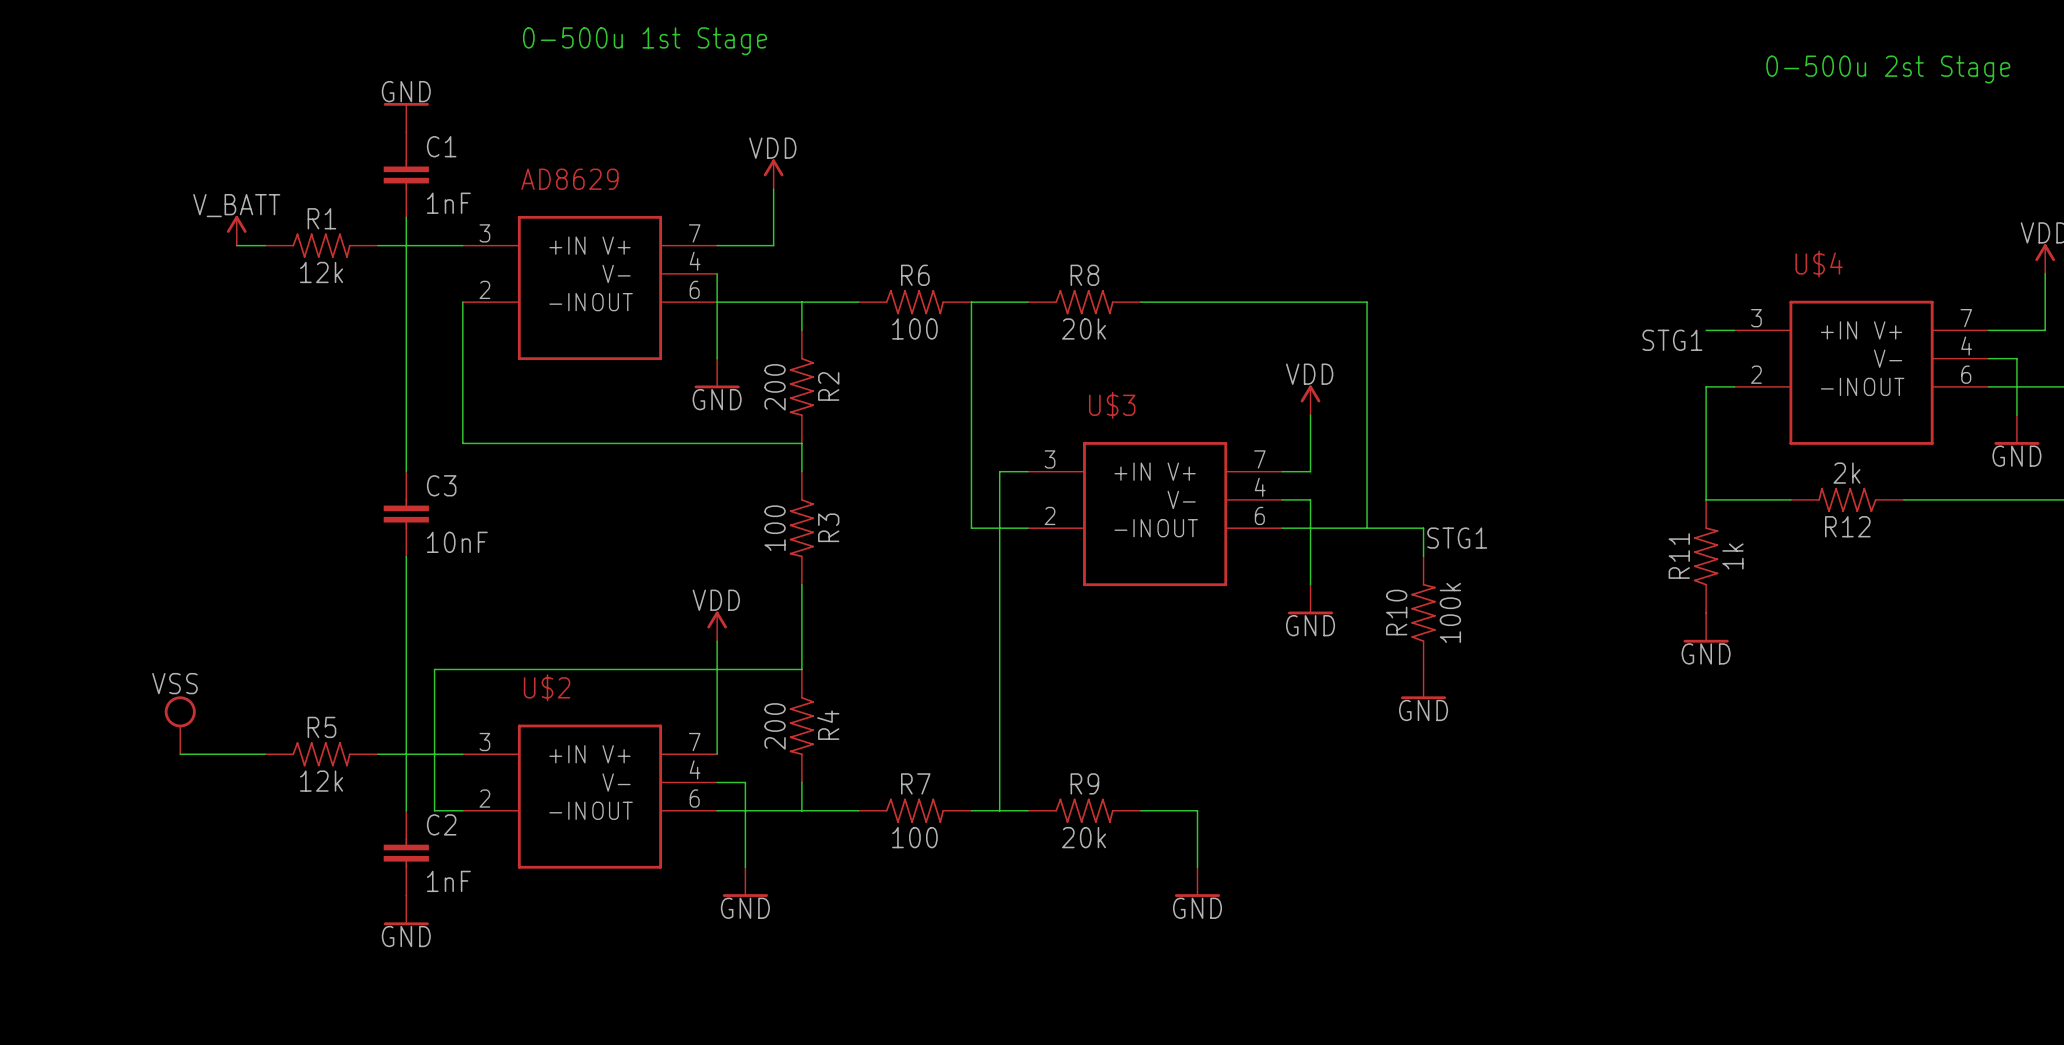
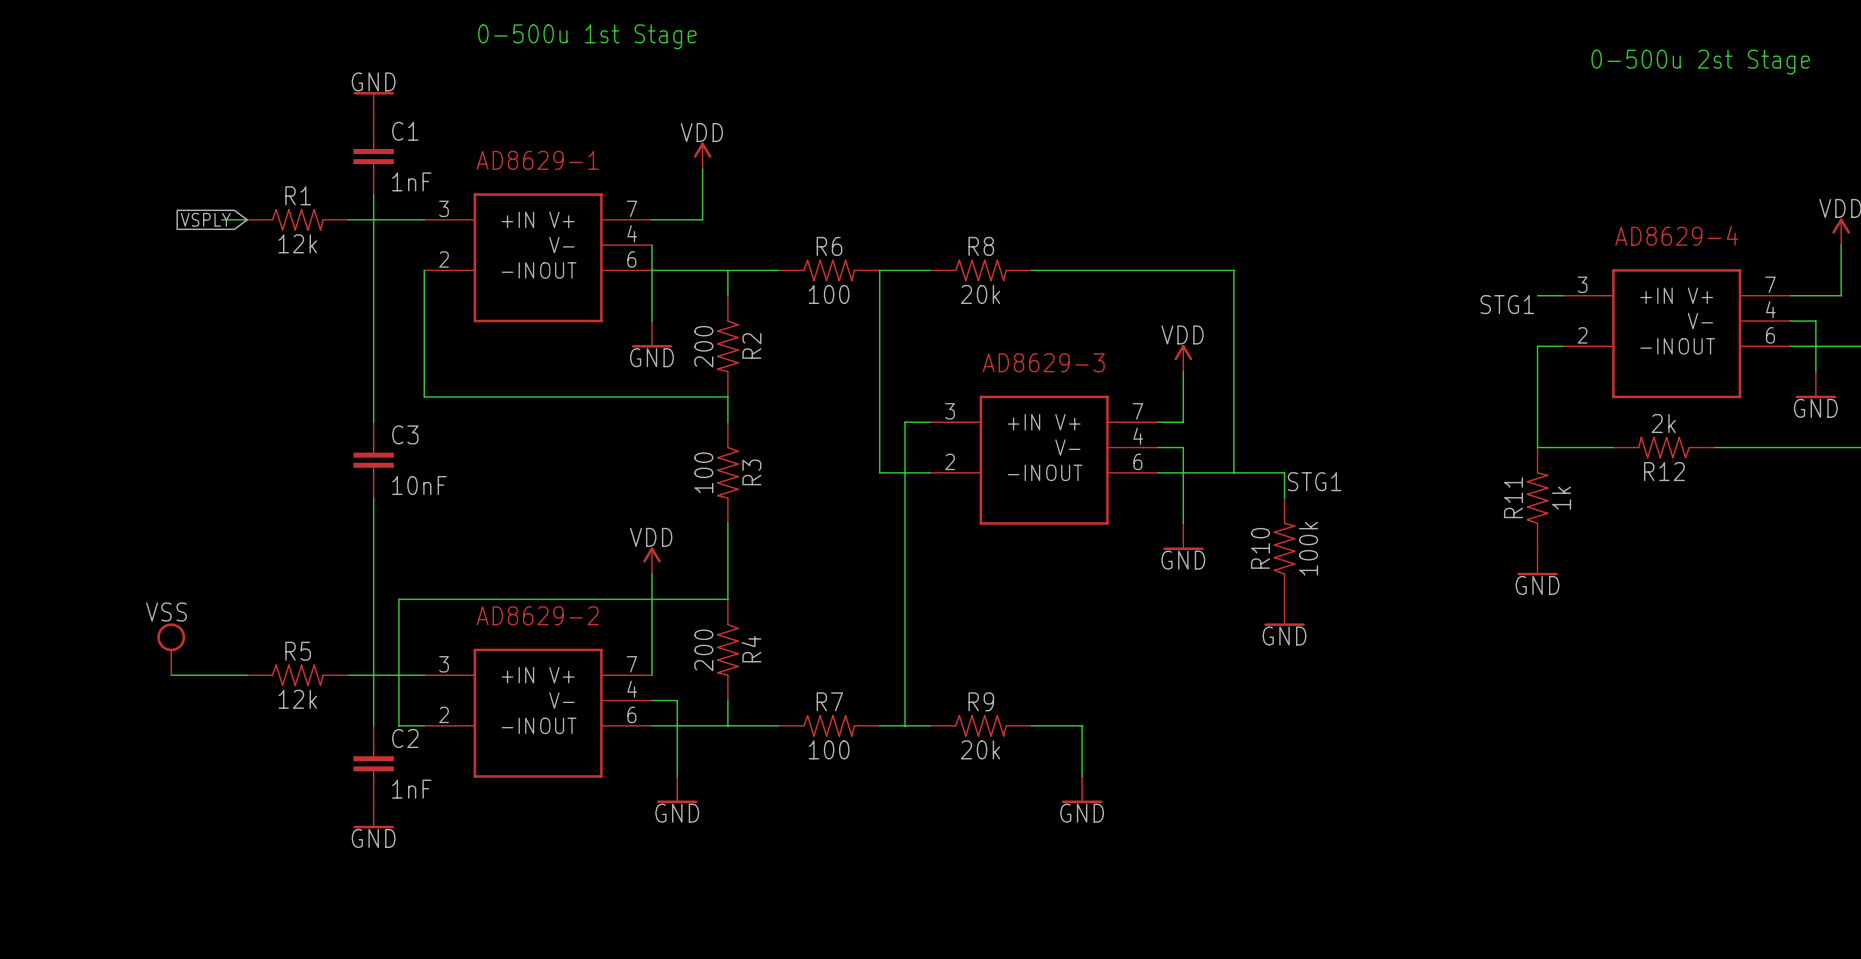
AD8629 name: AD8629 (569, 179) -> AD8629-1 (537, 160)
power symbol: V_BATT (236, 230) -> none
global label: none -> VSPLY (205, 219)
U$4 name: U$4 (1819, 263) -> AD8629-4 (1676, 235)
U$3 name: U$3 (1112, 405) -> AD8629-3 (1043, 362)
U$2 name: U$2 (547, 687) -> AD8629-2 (537, 615)

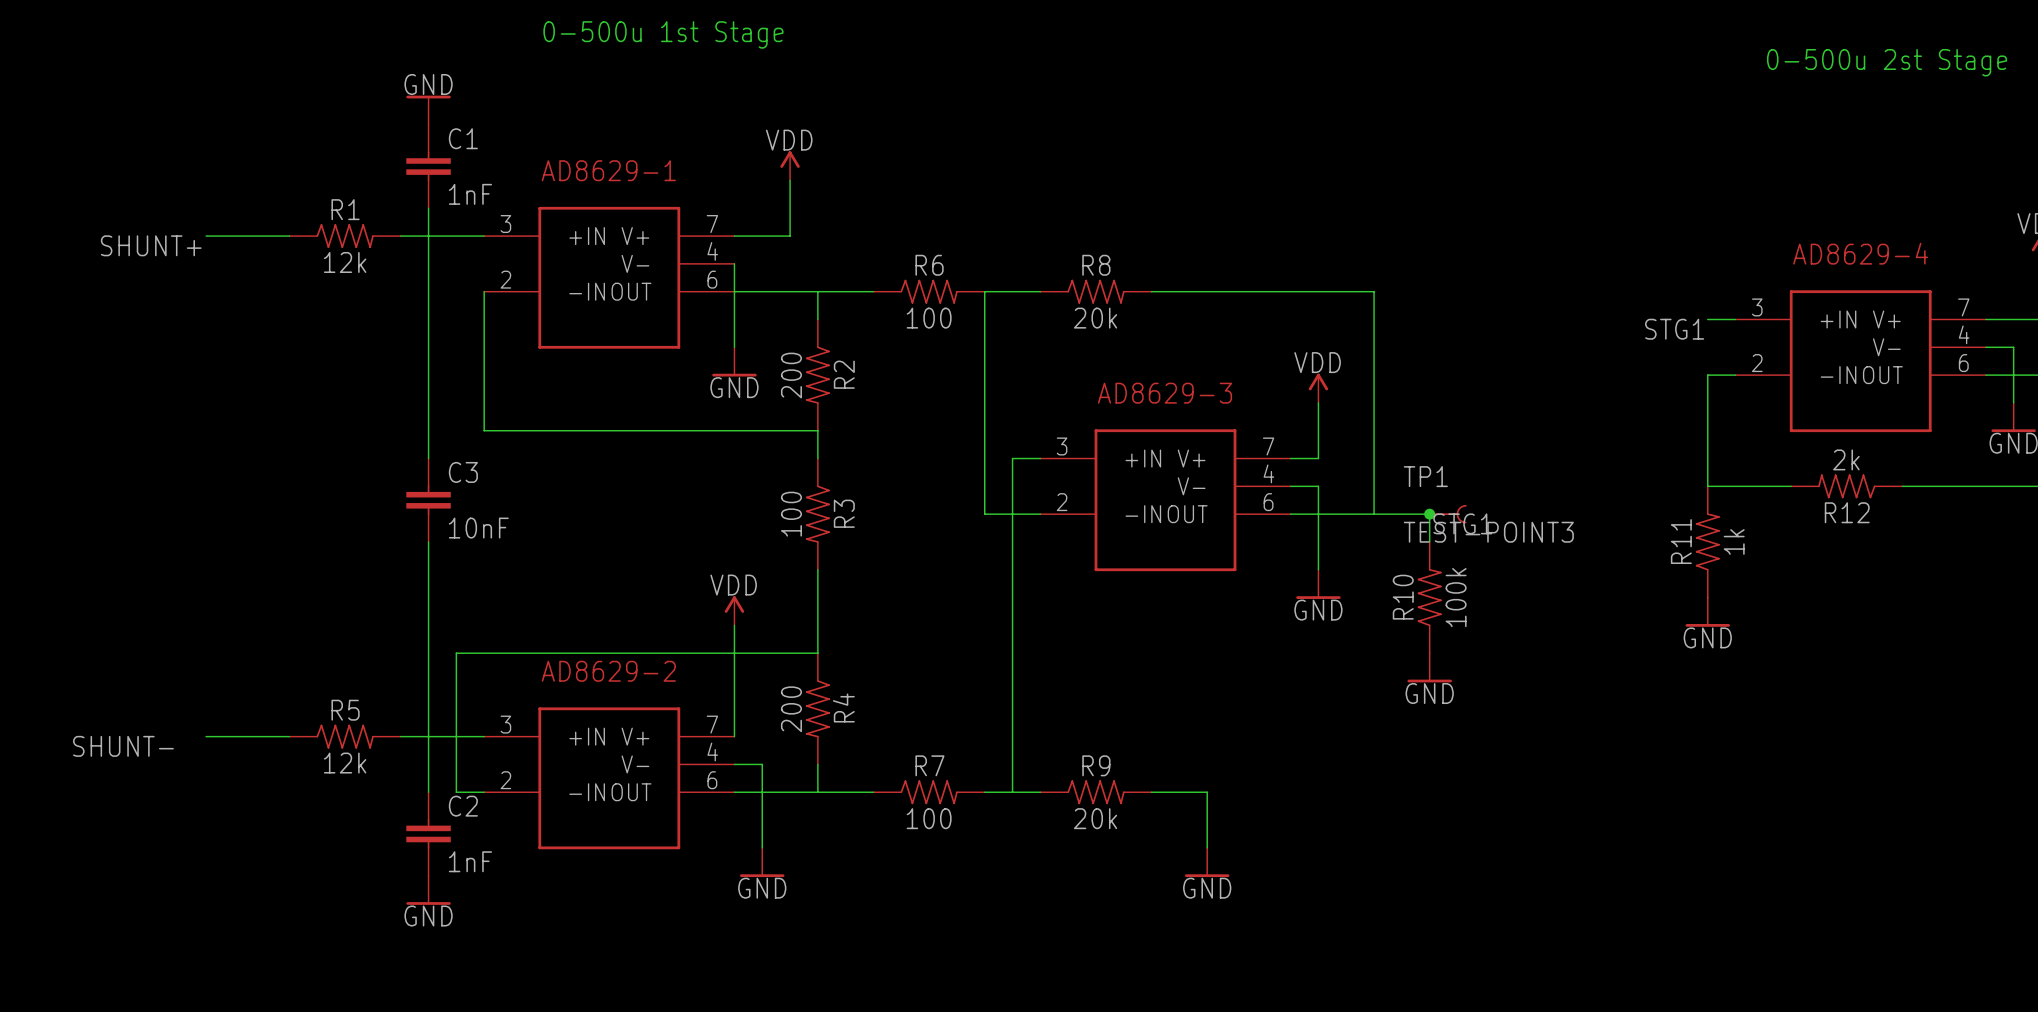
wire: none -> (206, 236) (261, 236)
global label: VSPLY (205, 219) -> none
label: none -> SHUNT+ (151, 245)
junction: none -> (1429, 514)
TP1: none -> TEST-POINT3 (1447, 514)
power symbol: VSS (171, 649) -> none
label: none -> SHUNT- (123, 746)

